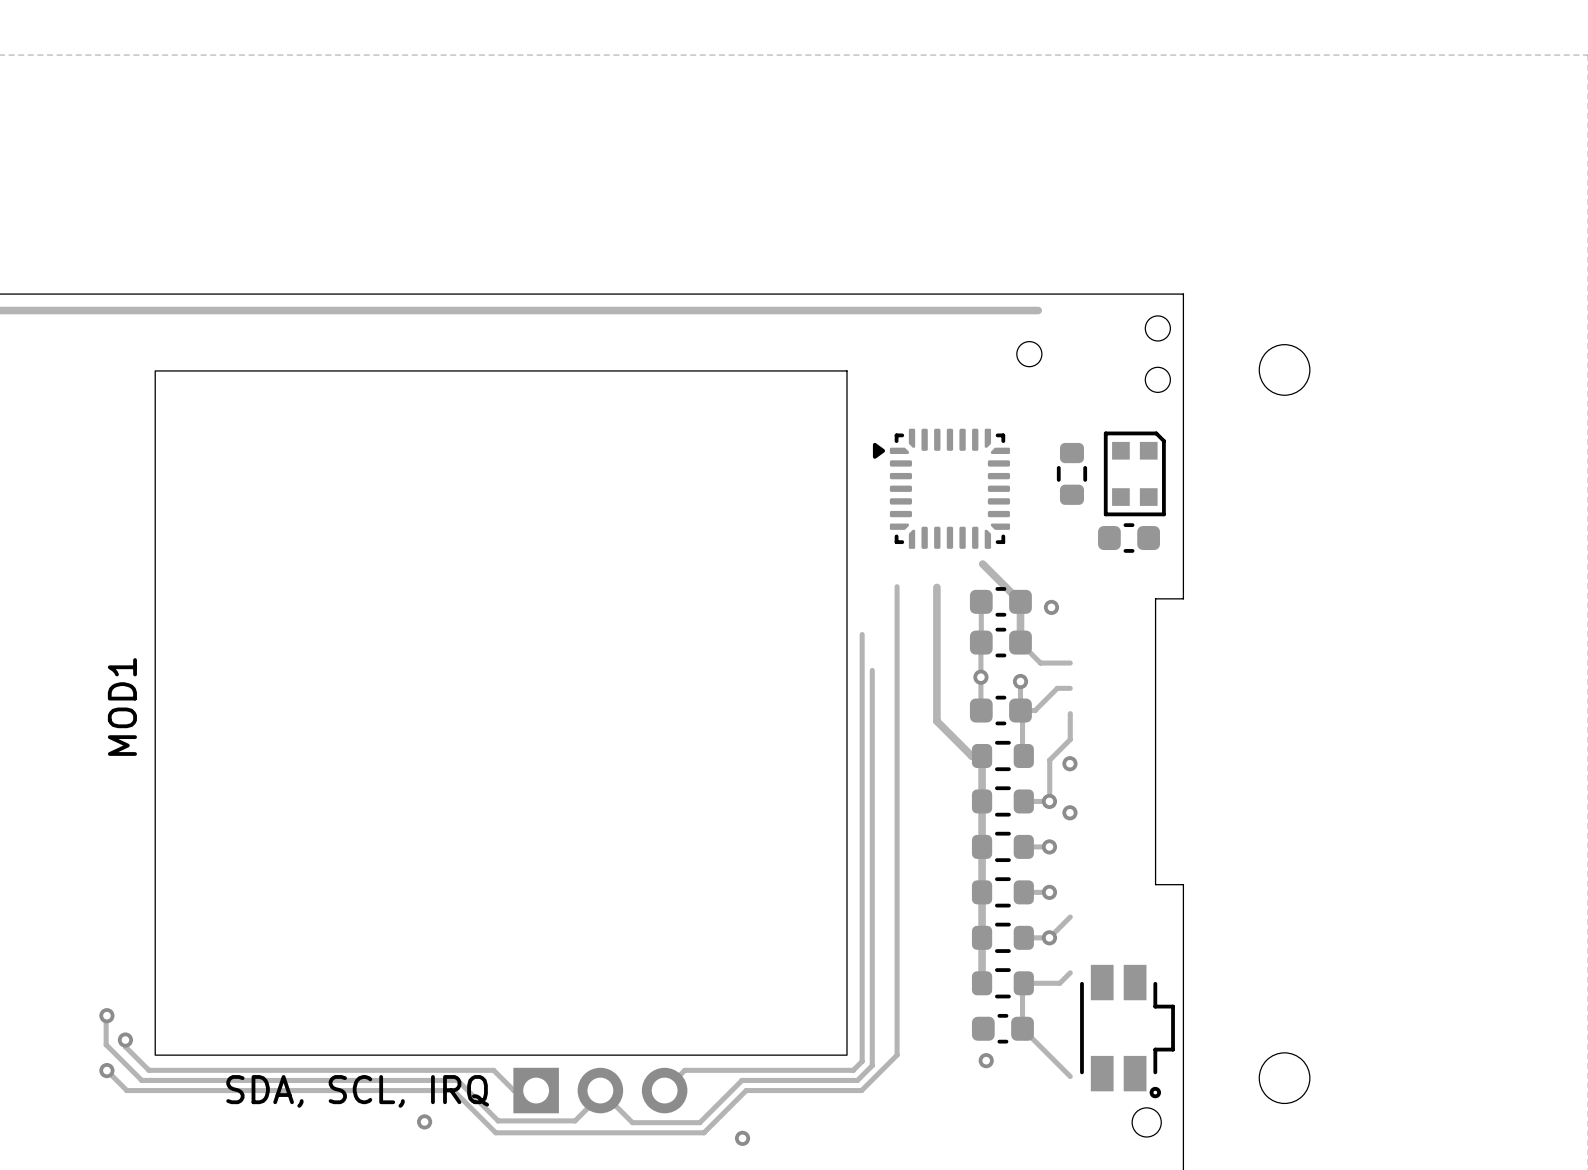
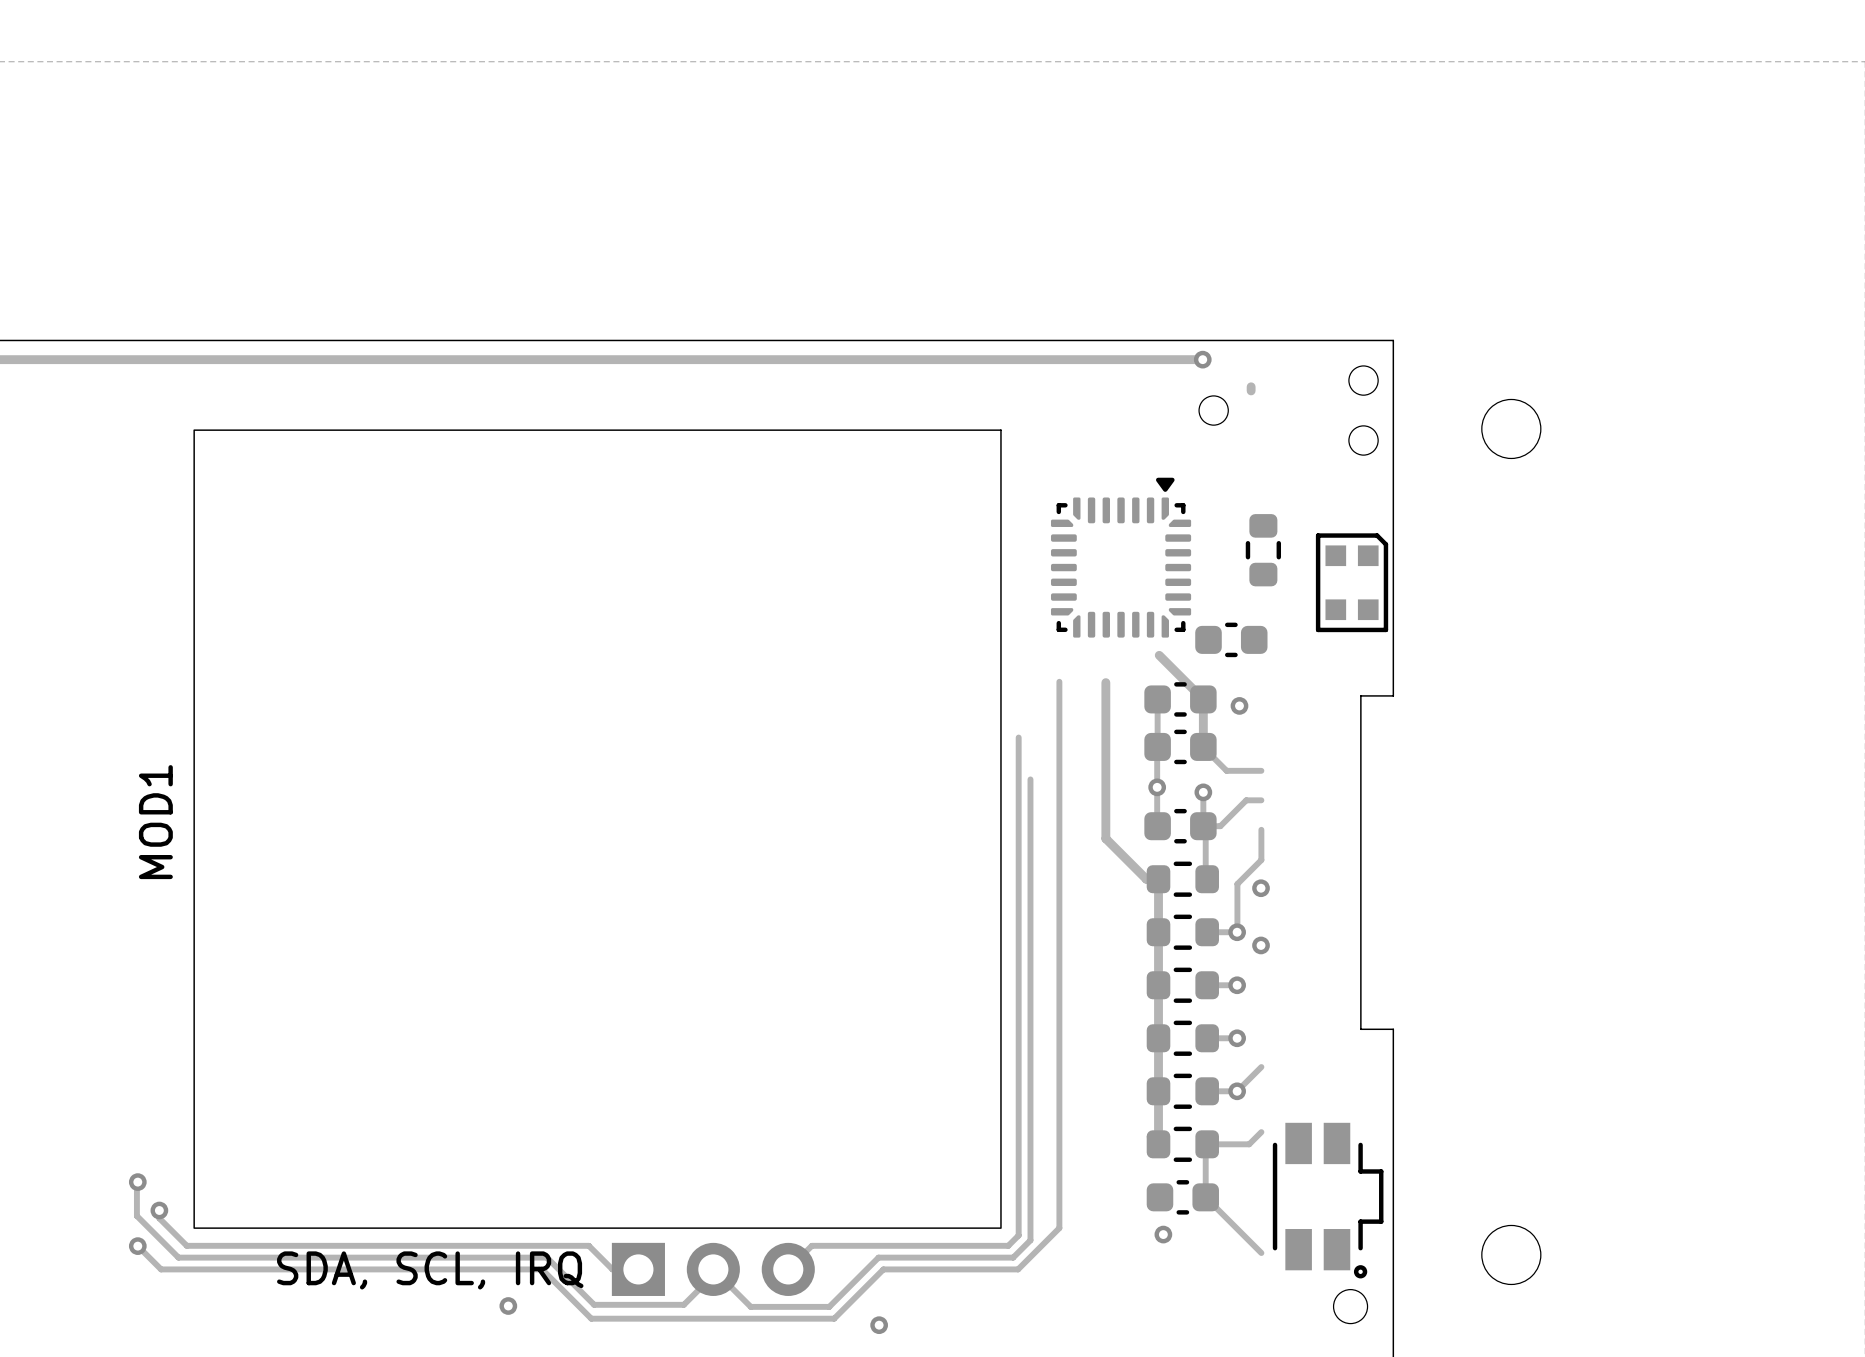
track: (1020, 310) (1038, 310) -> none
via: none -> (1202, 359)
track: none -> (1251, 386) (1251, 390)
part position: (1134, 473) -> (1352, 582)
part rotation: 0° (941, 488) -> 90° clockwise (1121, 557)
part position: (1129, 538) -> (1231, 639)

